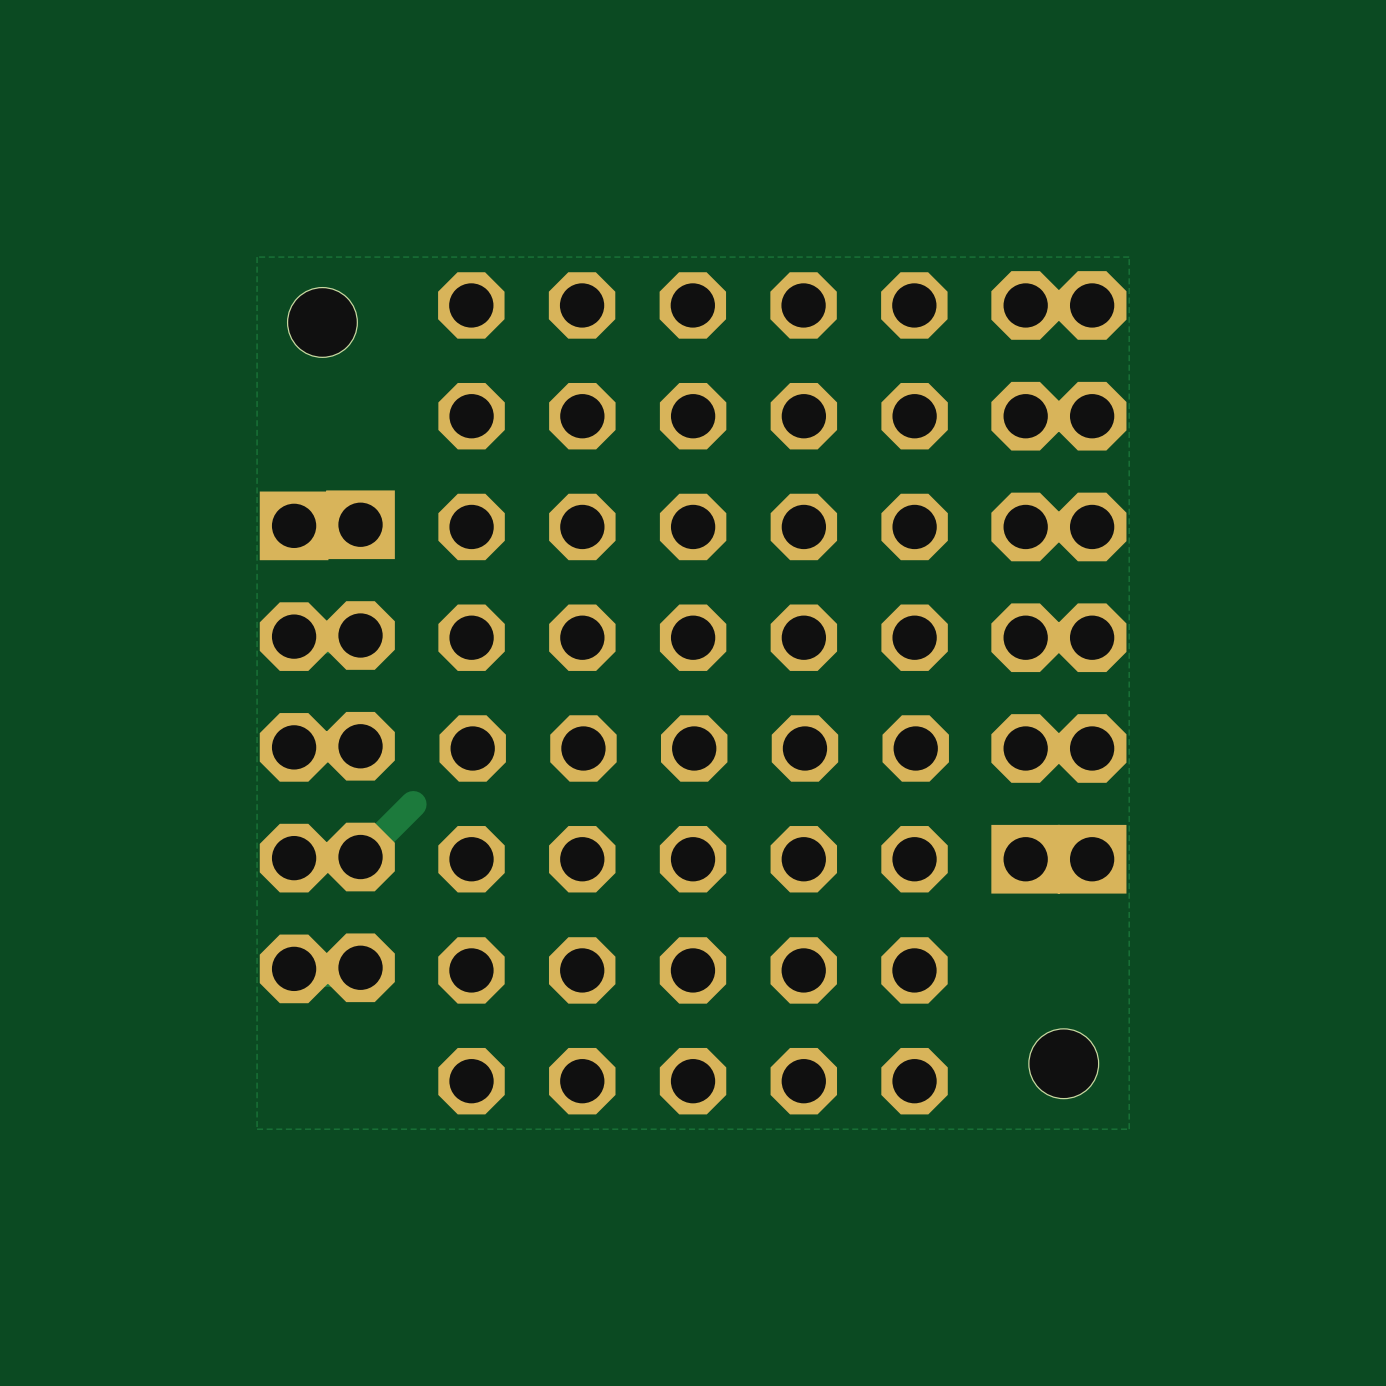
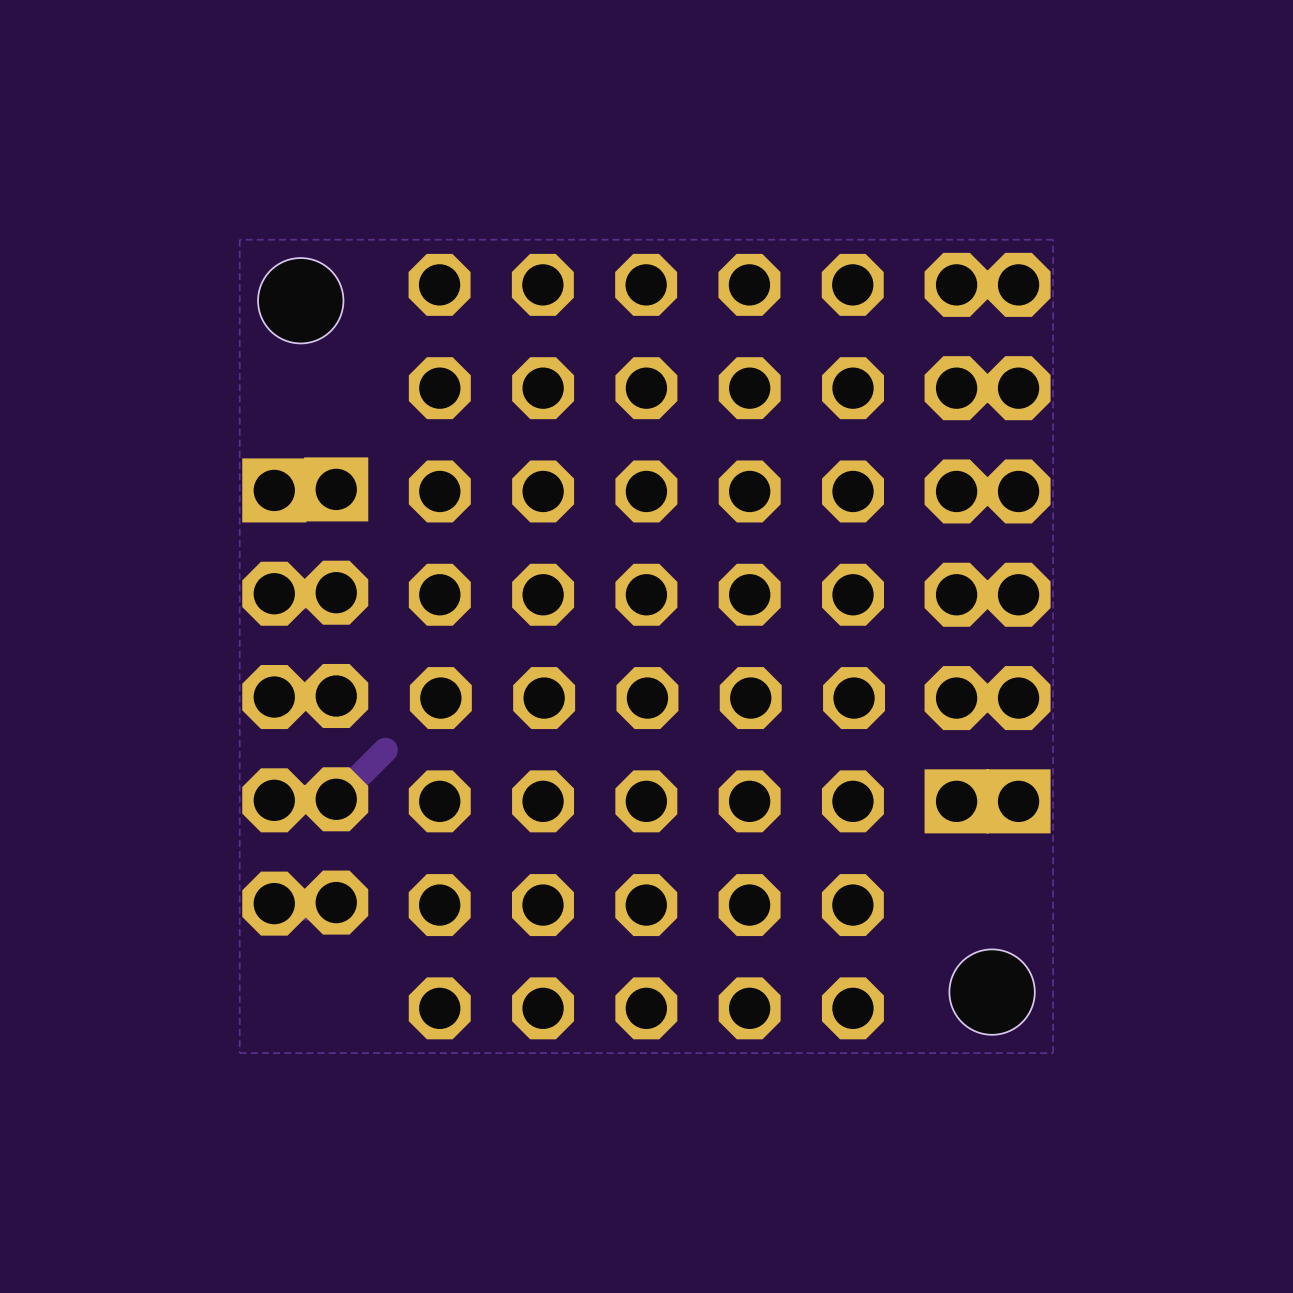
hole size: [287, 287, 358, 358] -> [258, 258, 344, 344]
hole size: [1028, 1028, 1099, 1099] -> [949, 949, 1035, 1035]

